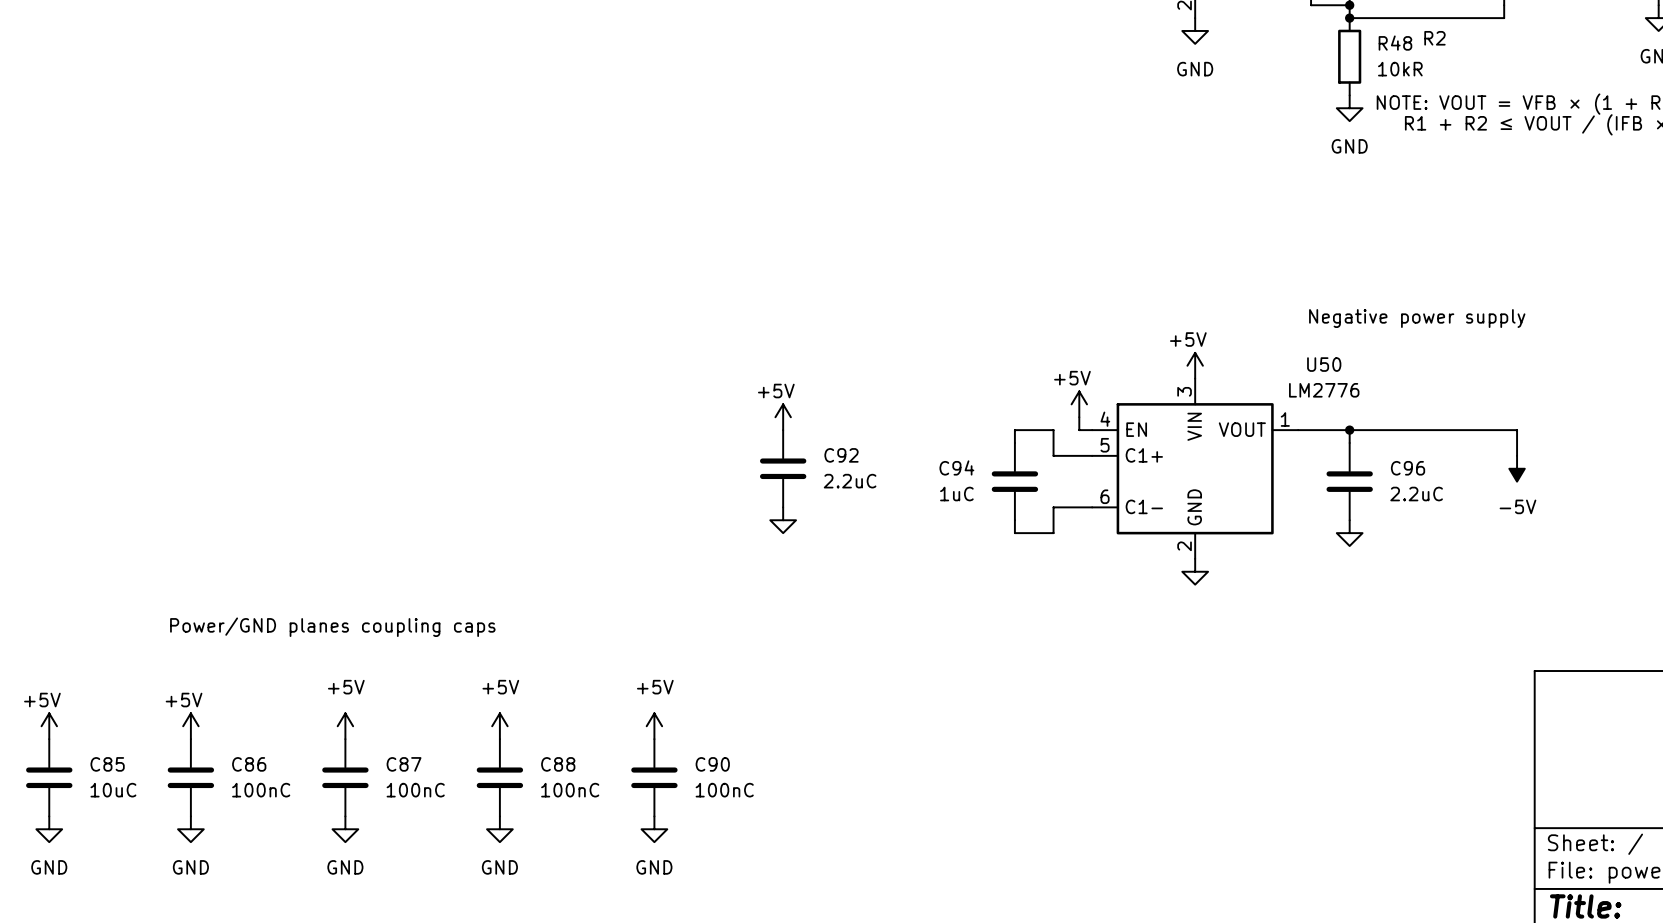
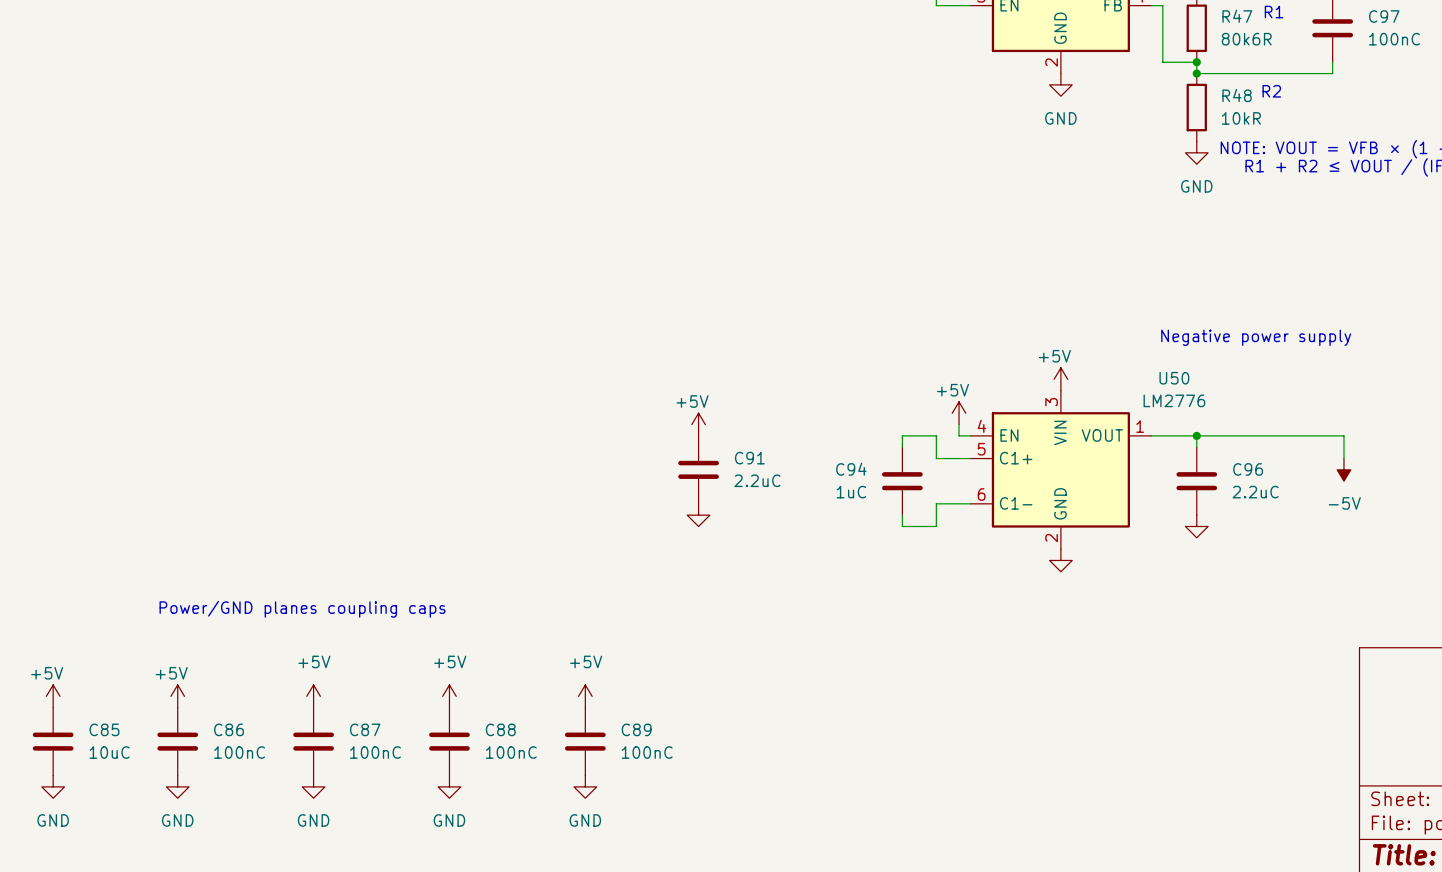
C92 name: C92 (841, 455) -> C91 (749, 458)
C90 name: C90 (712, 764) -> C89 (636, 729)

